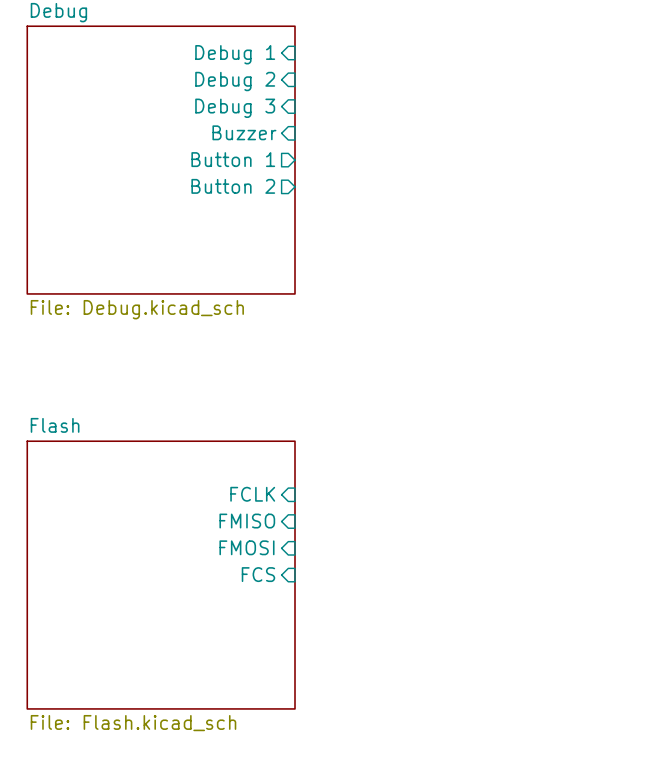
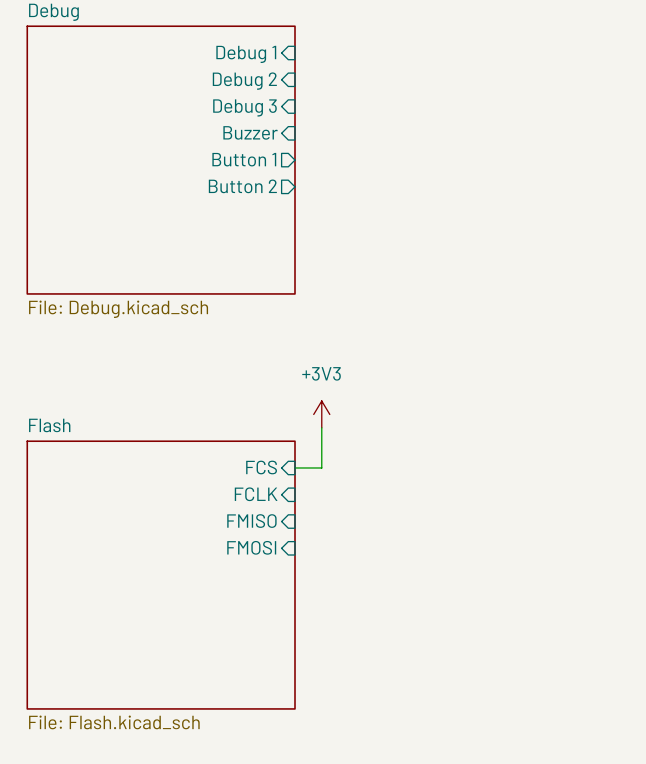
power symbol: none -> +3V3 (321, 414)
wire: none -> (321, 427) (321, 467) (295, 467)
sheet pin position: FCS (258, 574) -> FCS (261, 467)

